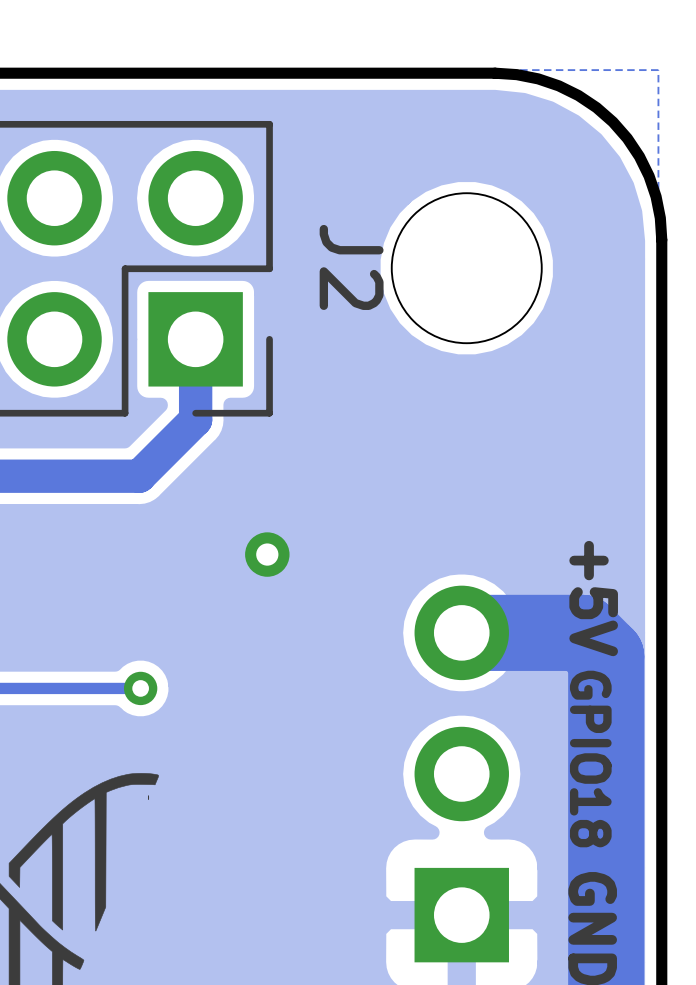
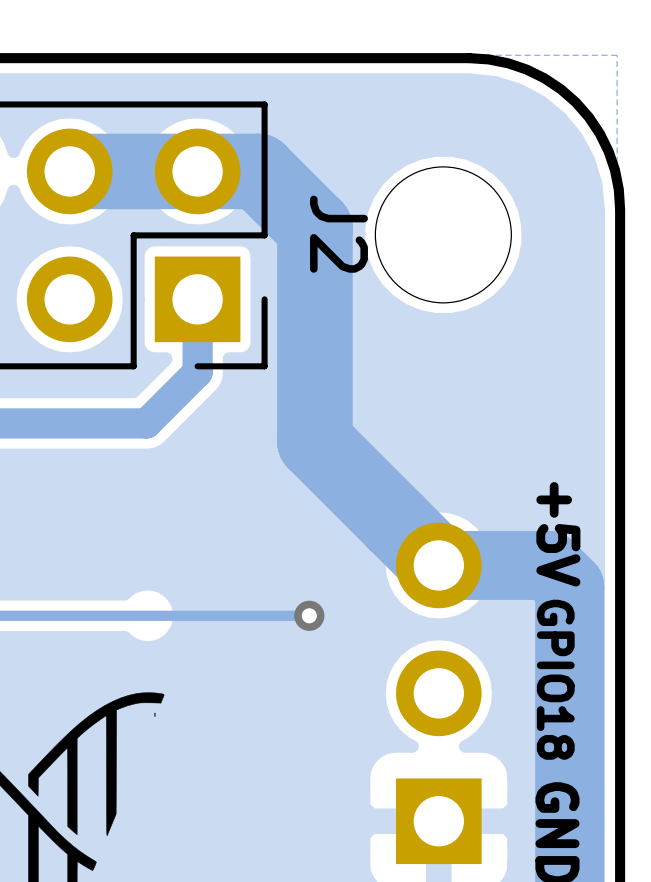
track: none -> (69, 171) (258, 171) (314, 228) (314, 441) (438, 565)
via: (267, 554) -> none
via position: (140, 688) -> (309, 615)
track: none -> (309, 615) (147, 615)

